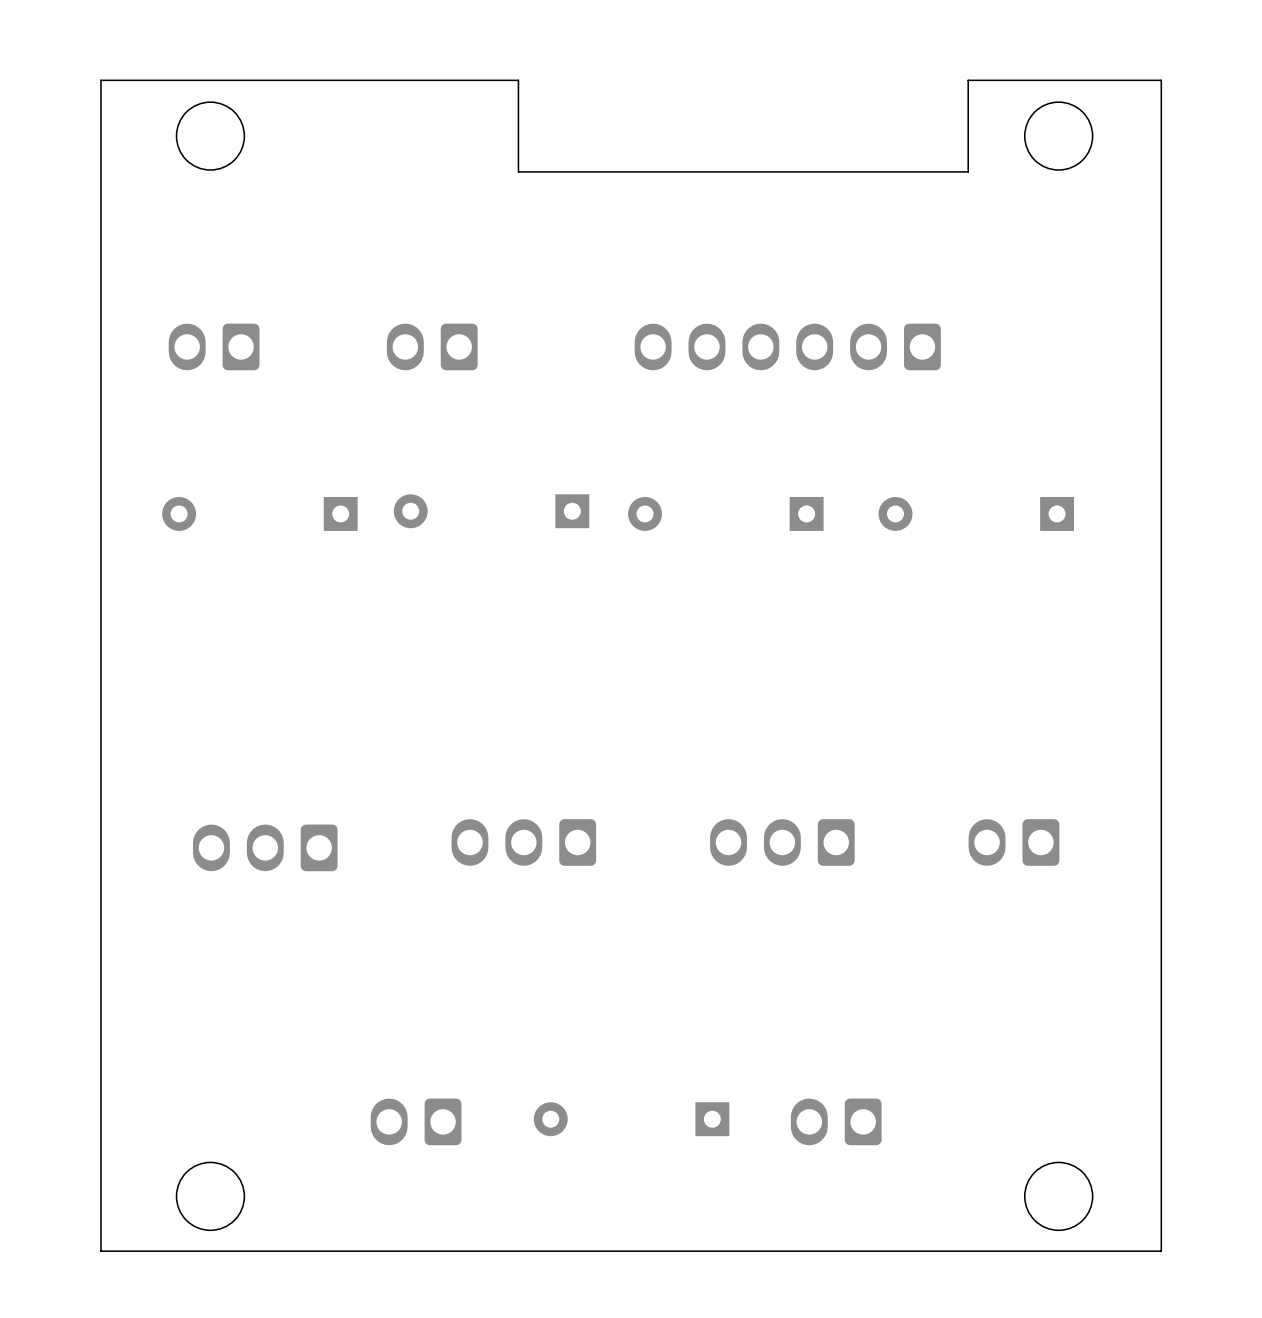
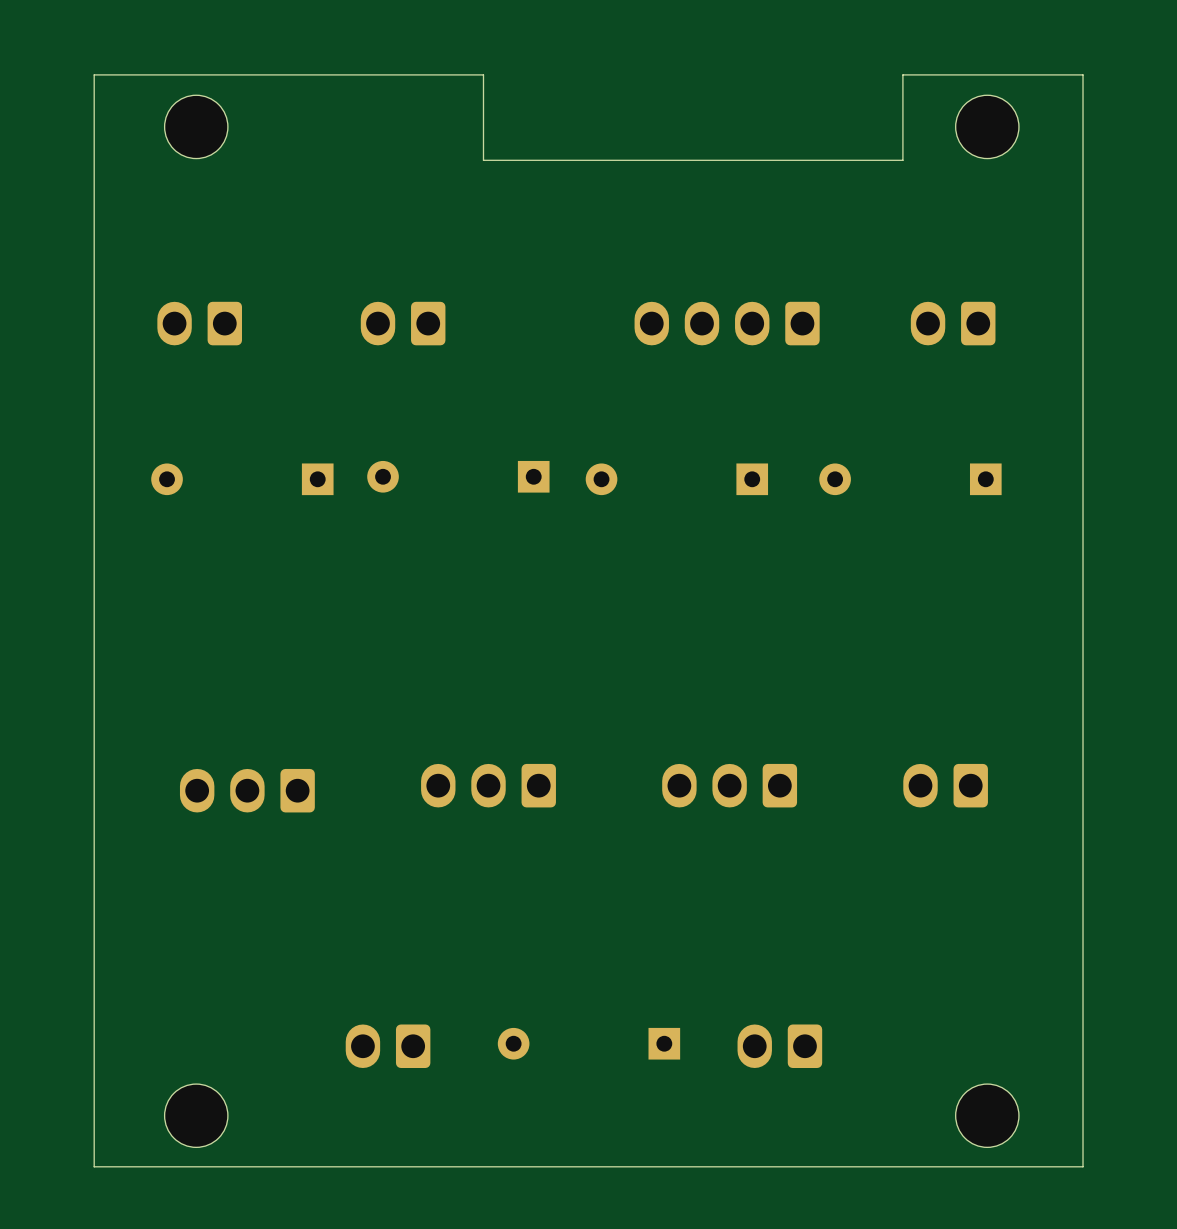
part footprint: [634, 323, 941, 371] -> [634, 301, 820, 346]
part: none -> (953, 323)

